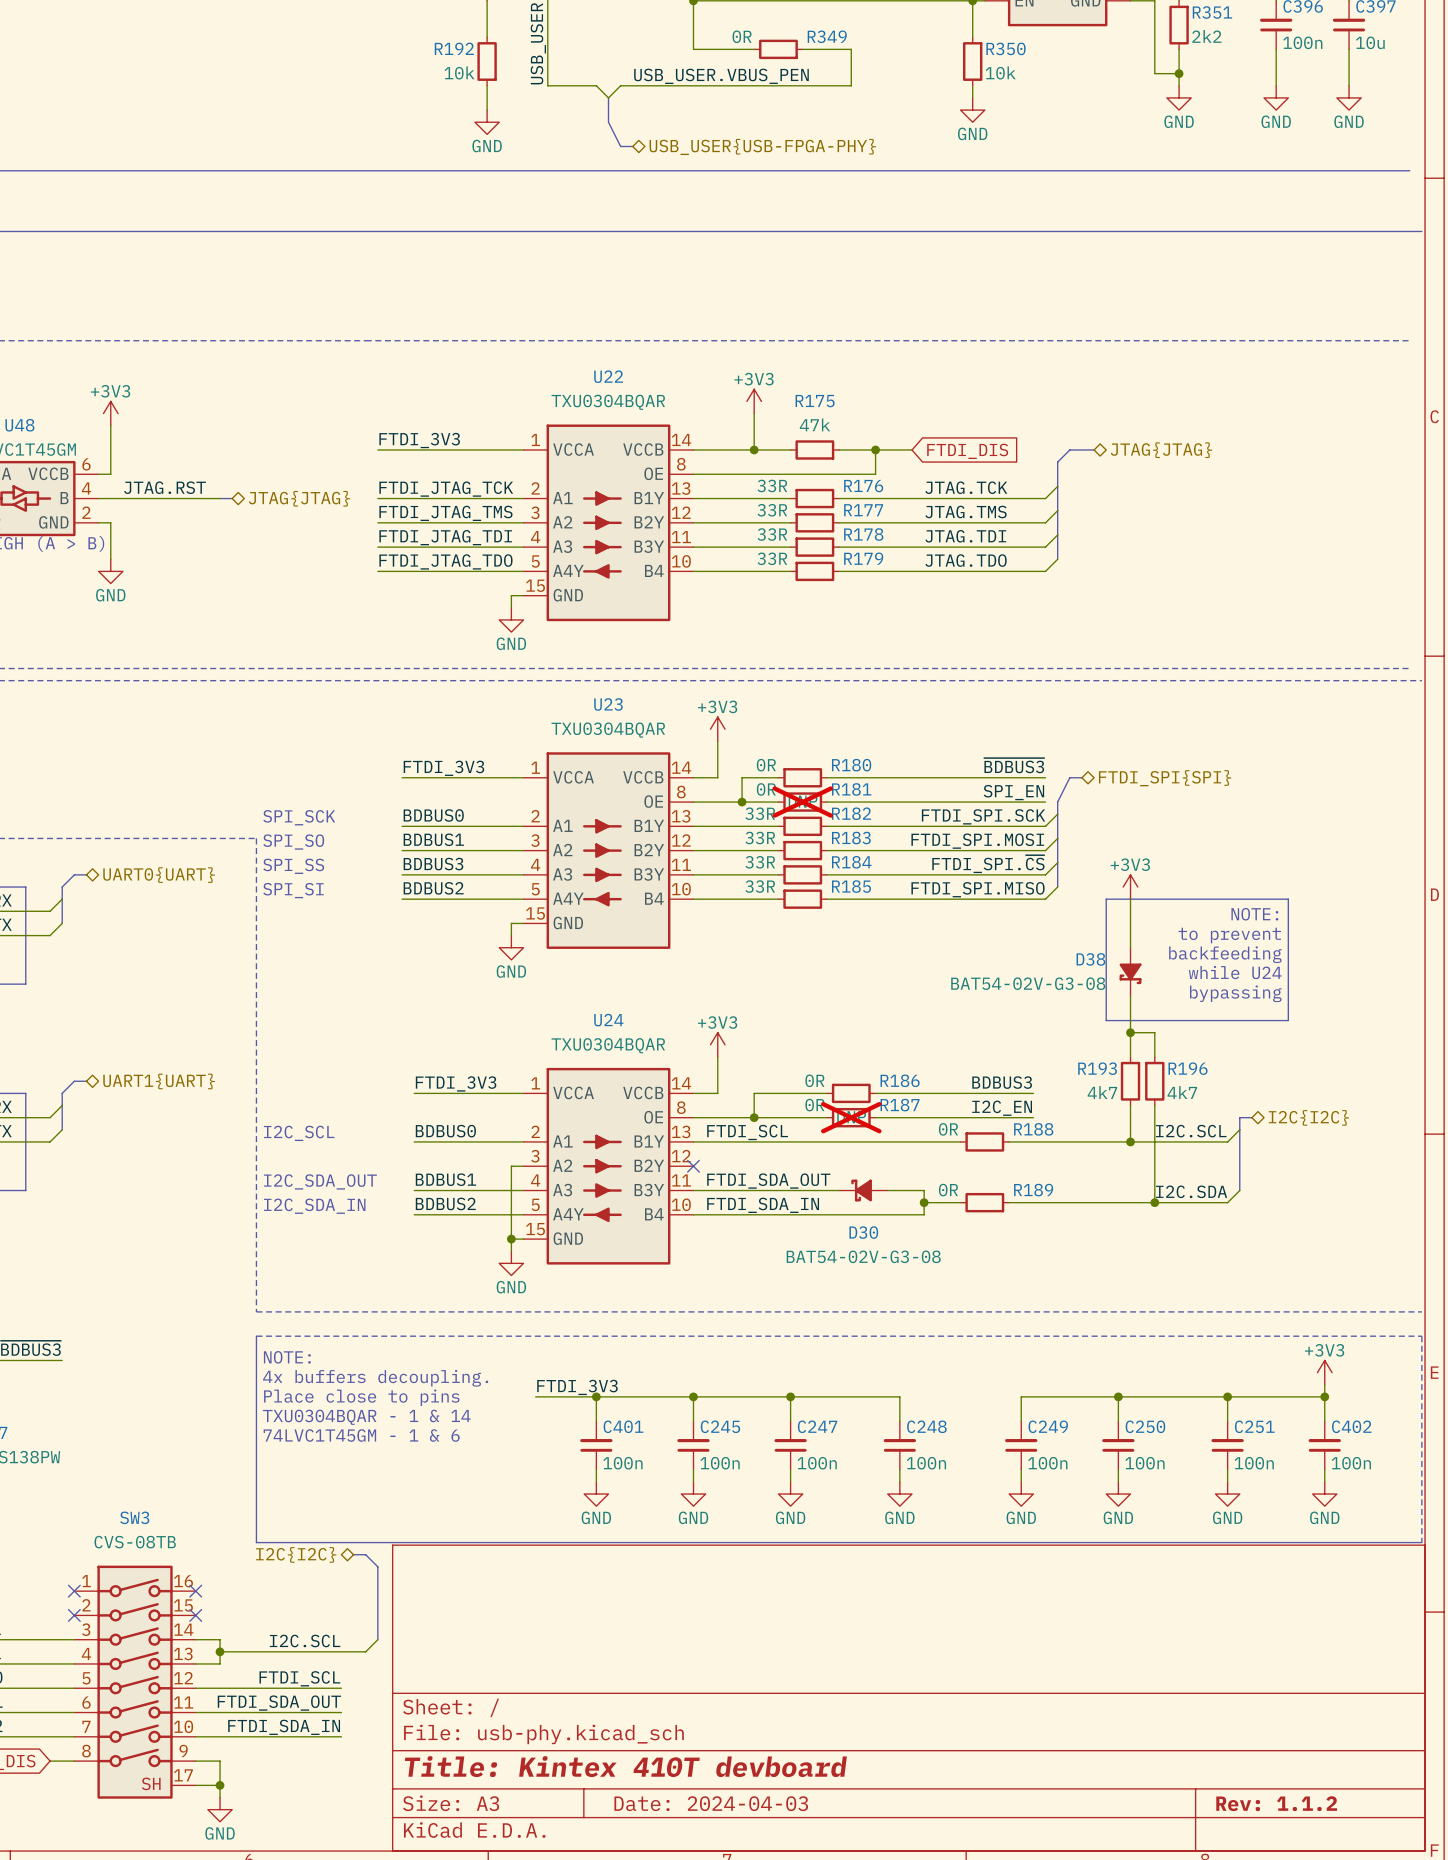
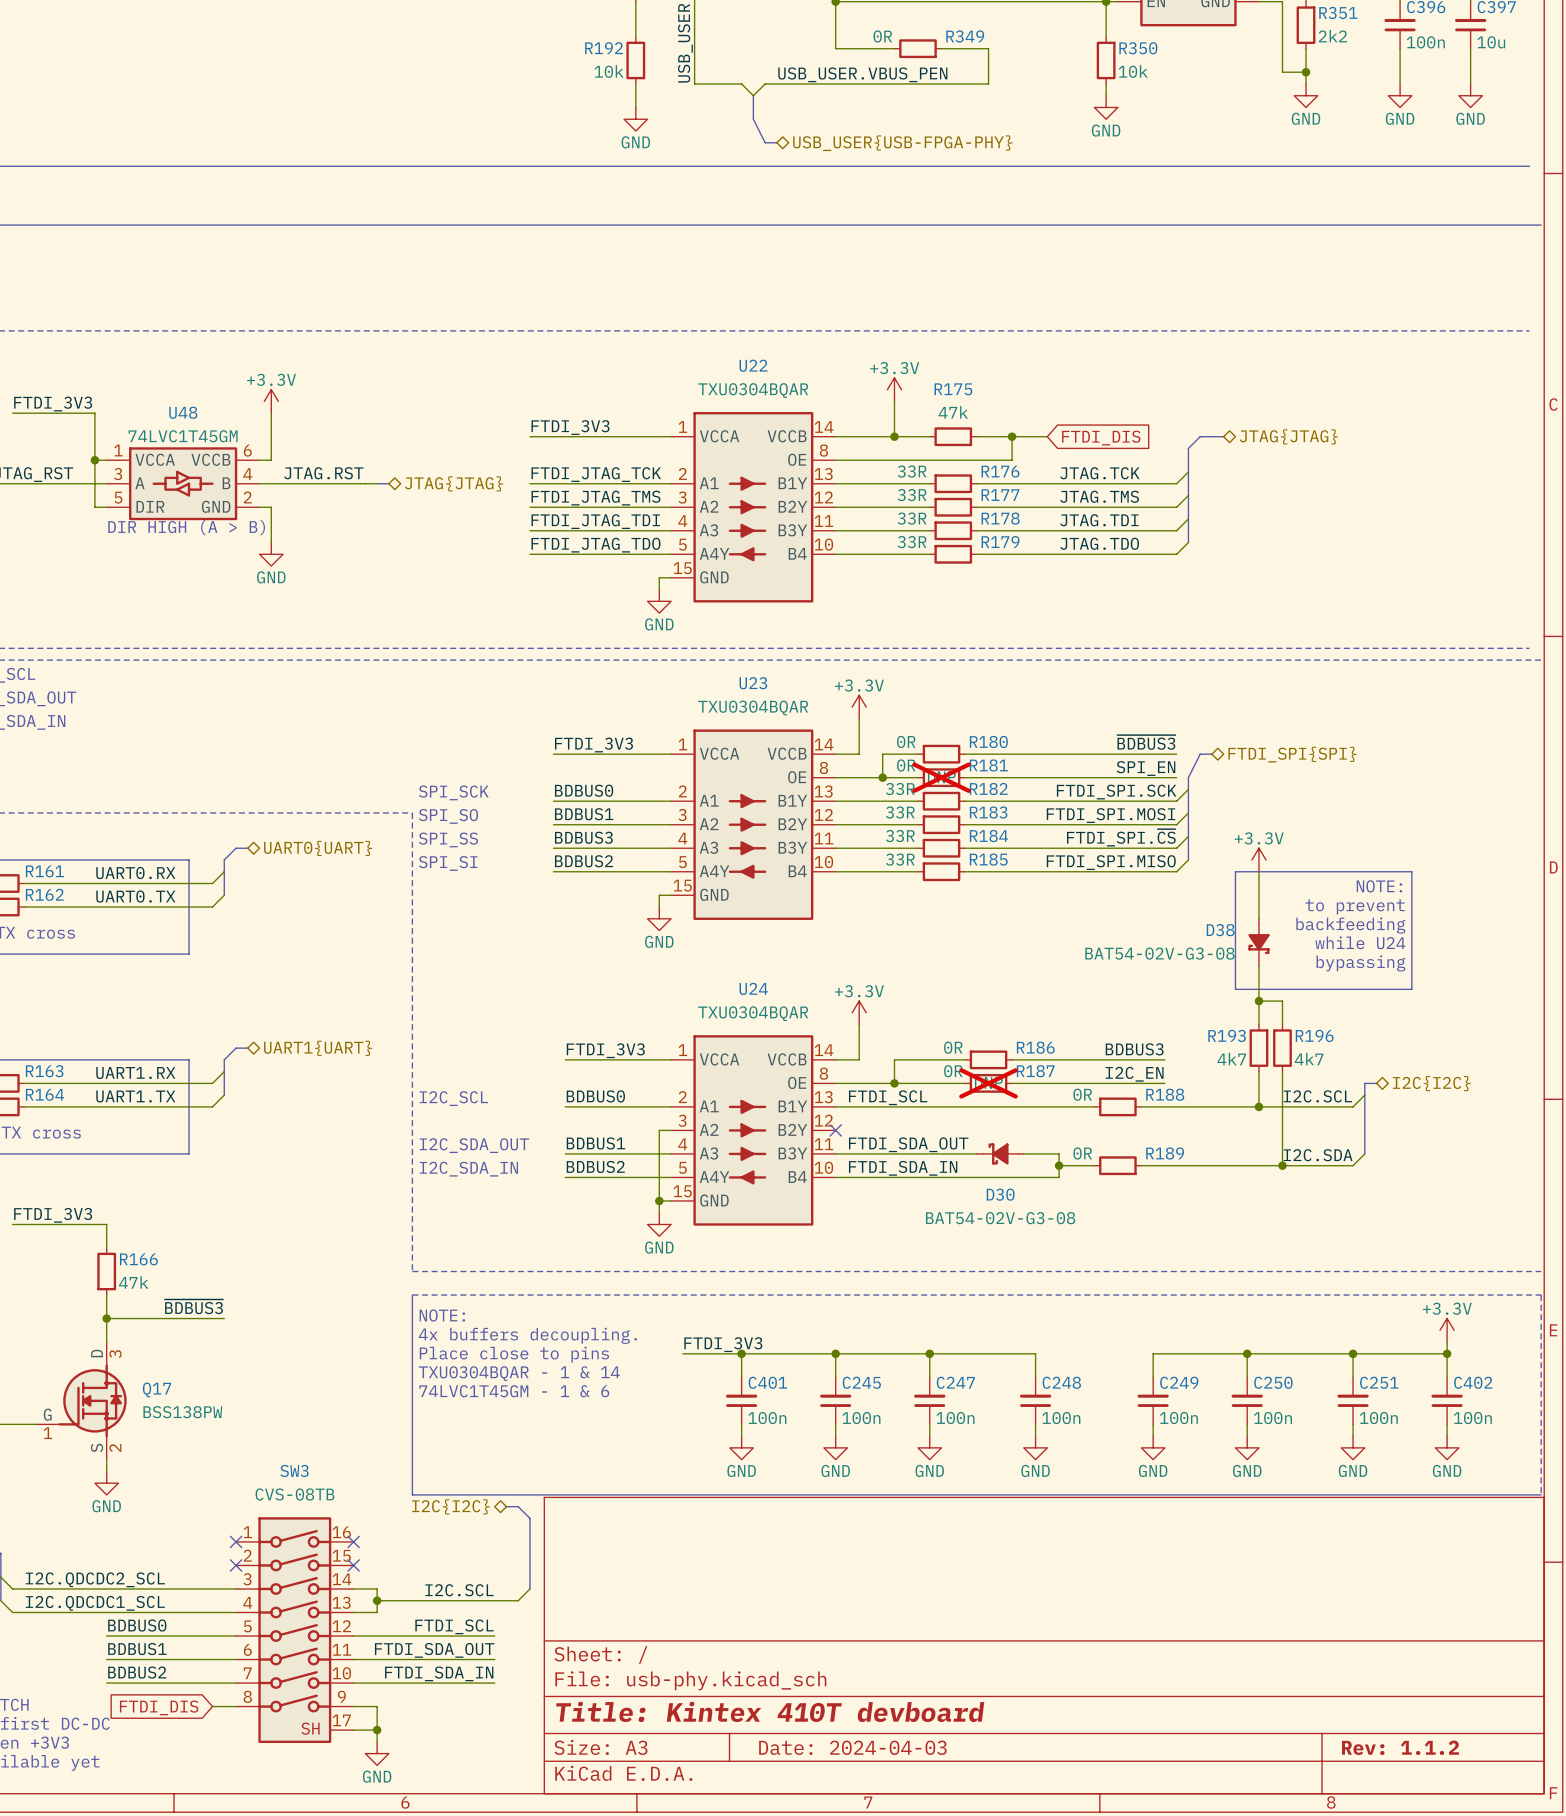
power symbol: +3V3 (754, 401) -> +3.3V (894, 389)
power symbol: +3V3 (110, 413) -> +3.3V (271, 401)
power symbol: +3V3 (717, 729) -> +3.3V (859, 707)
power symbol: +3V3 (1130, 887) -> +3.3V (1258, 859)
power symbol: +3V3 (717, 1044) -> +3.3V (859, 1012)
power symbol: +3V3 (1324, 1372) -> +3.3V (1447, 1330)

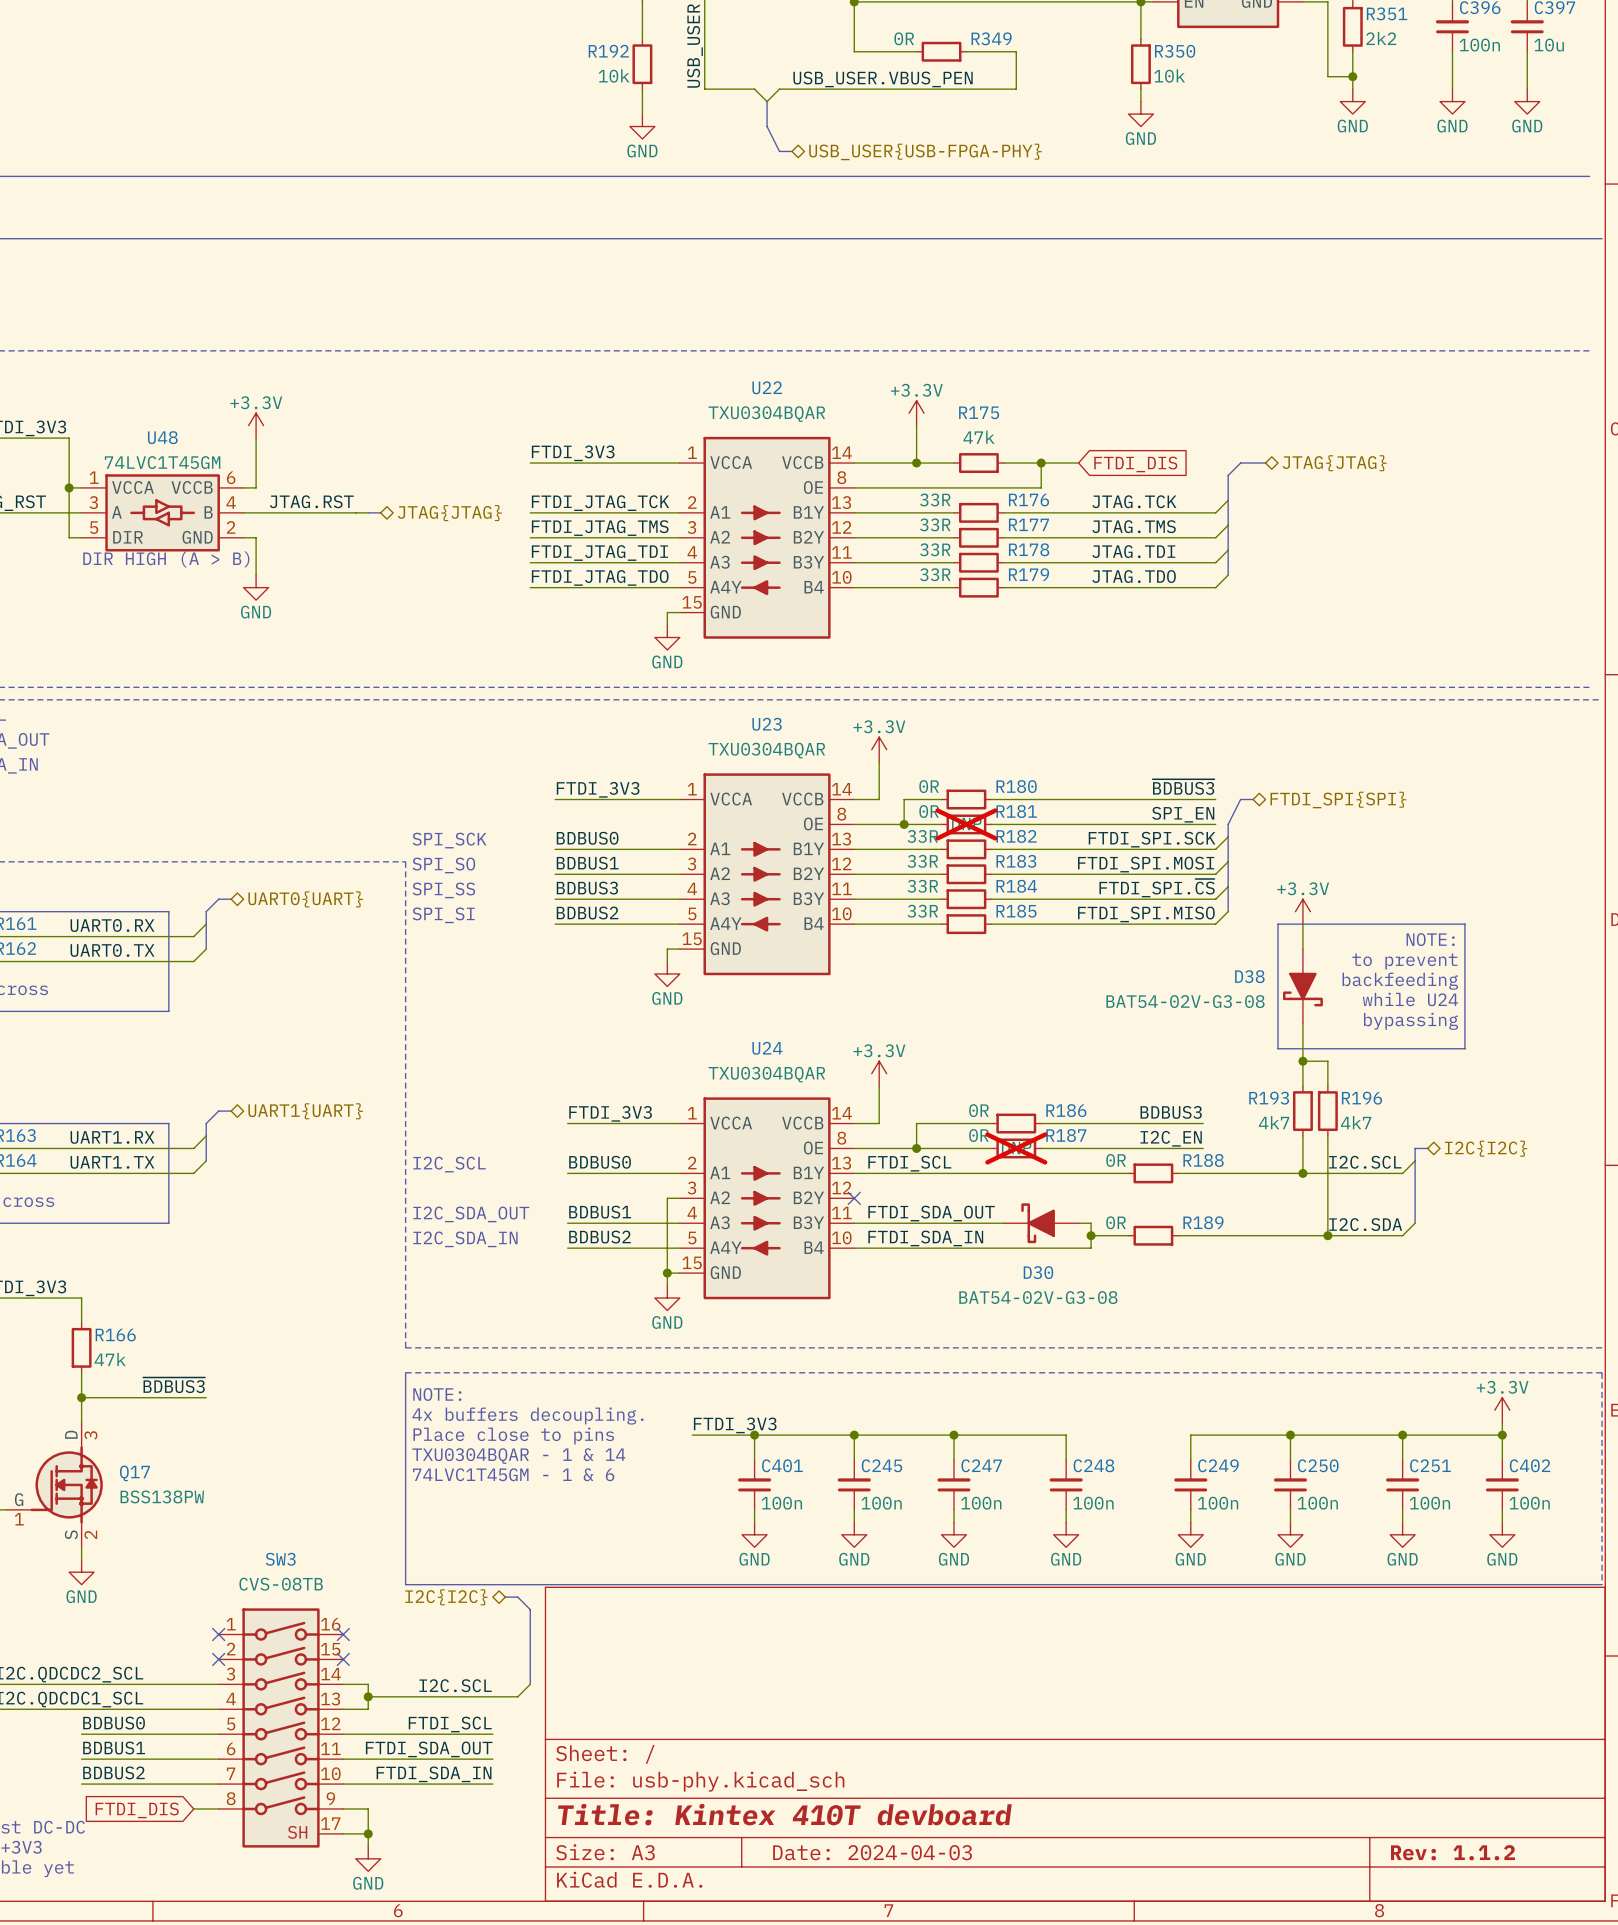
D38 symbol: [1248, 918, 1270, 966] -> [1283, 949, 1323, 1024]
D30 symbol: [976, 1143, 1024, 1165] -> [1003, 1203, 1079, 1244]

